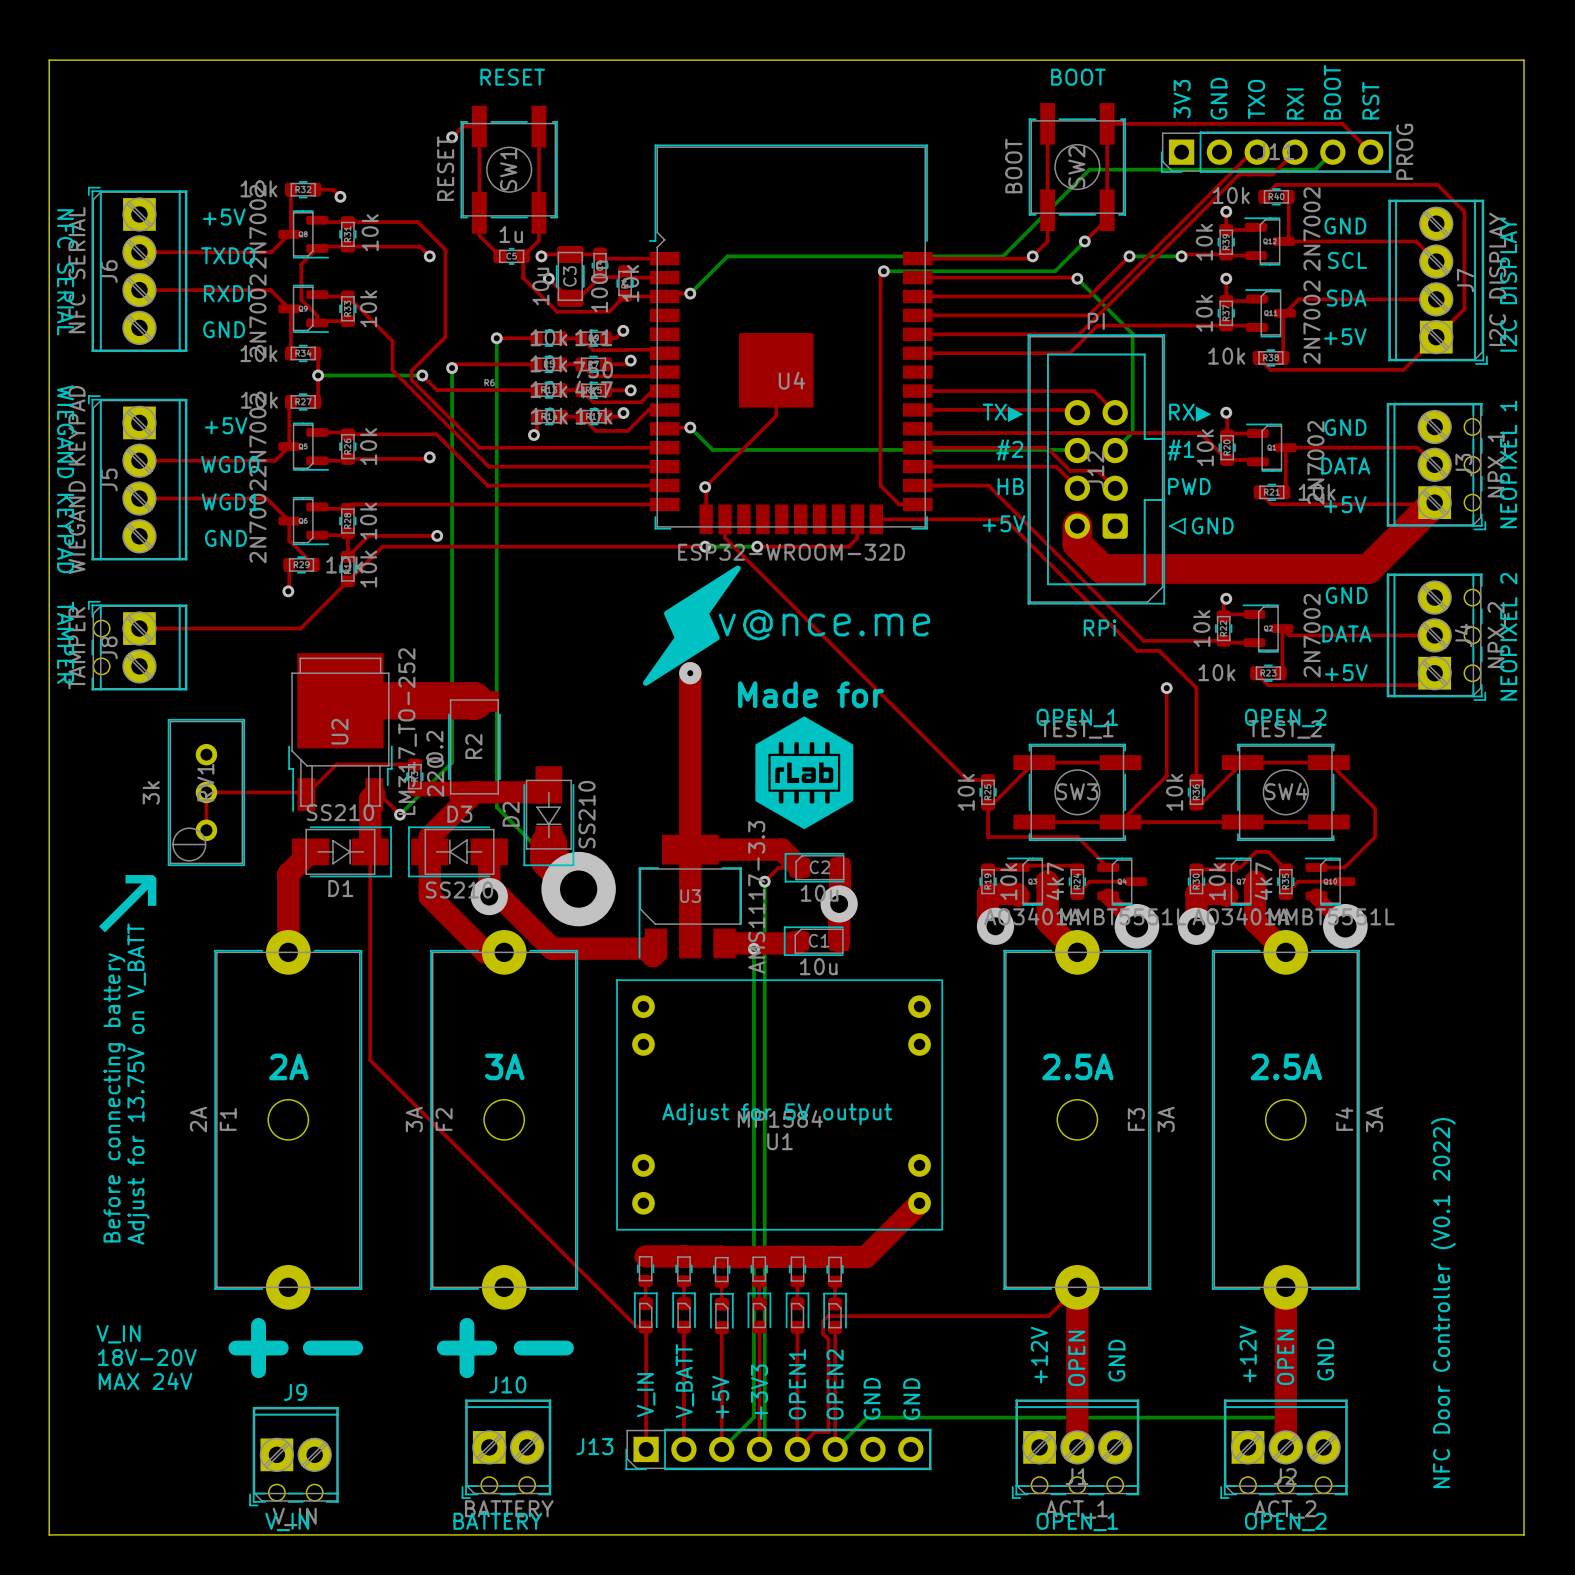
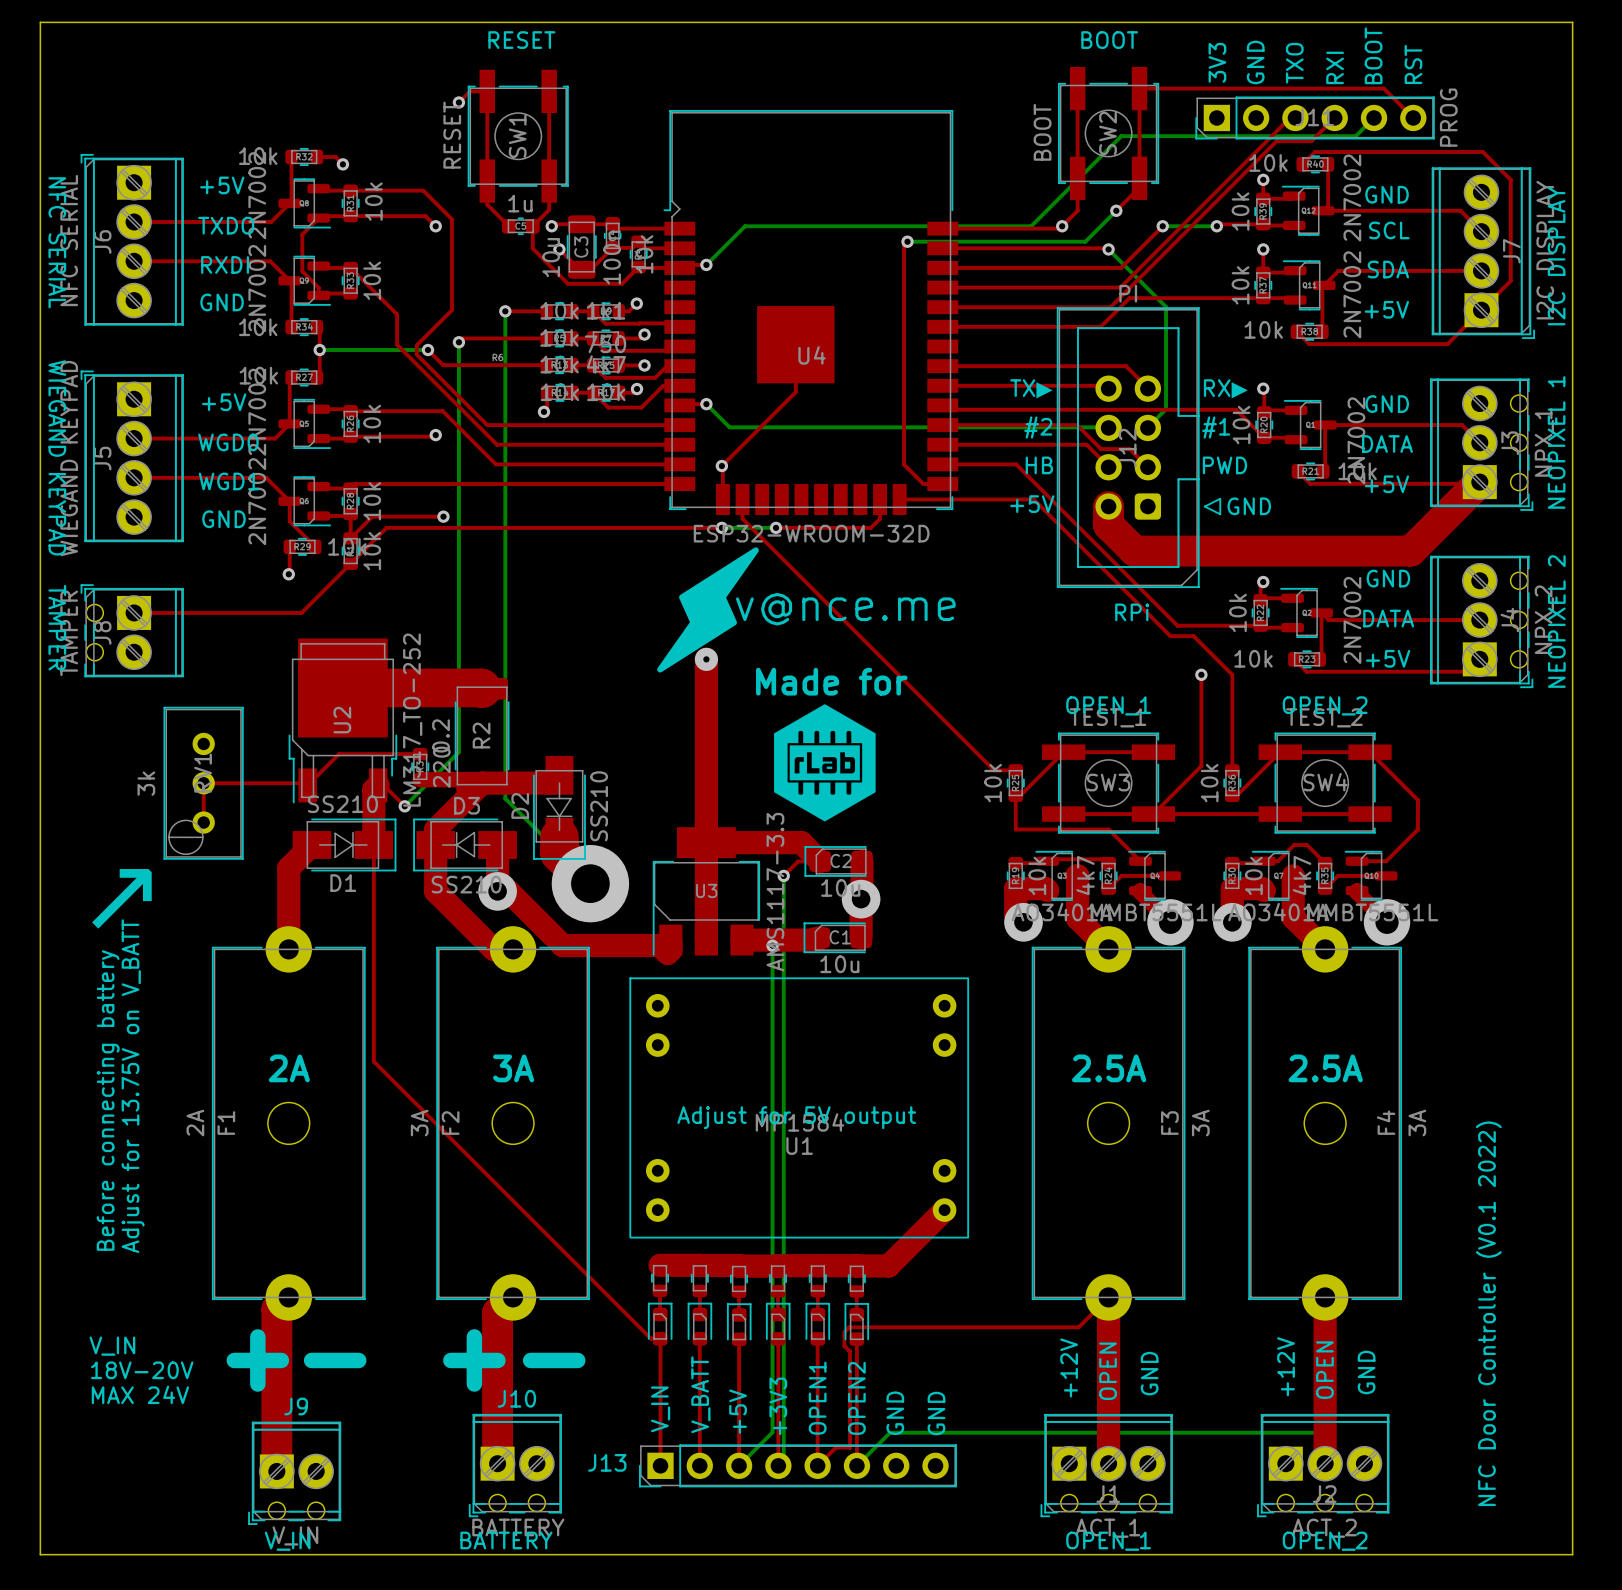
top track: none -> (288, 1297) (276, 1309) (276, 1471)
top track: none -> (513, 1297) (497, 1312) (497, 1463)

